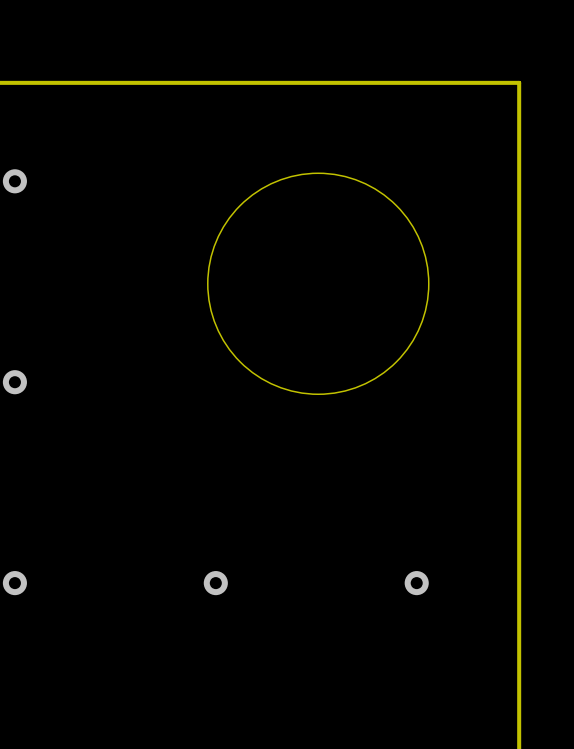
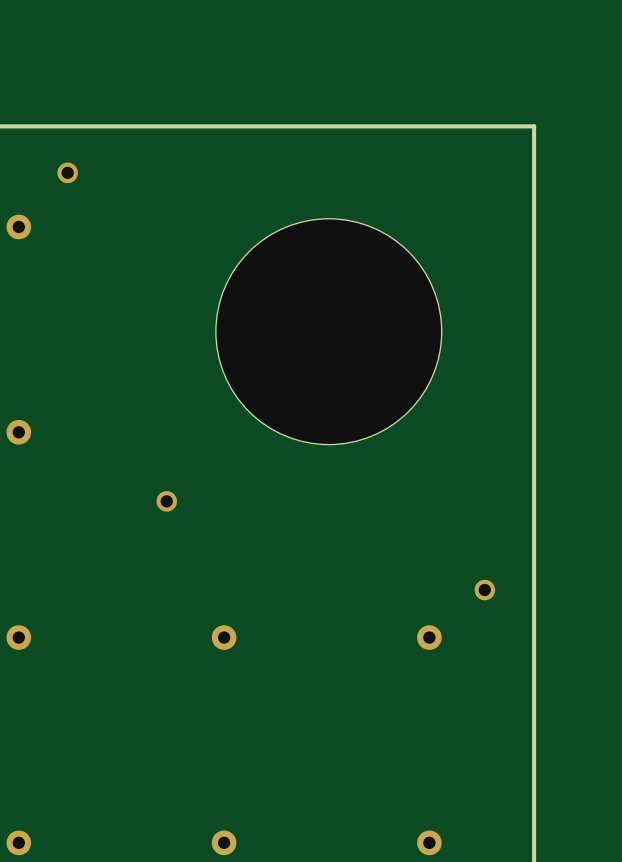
via: none -> (67, 172)
via: none -> (166, 501)
via: none -> (484, 590)

